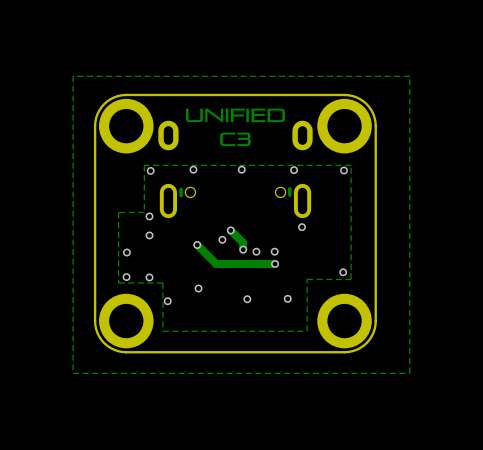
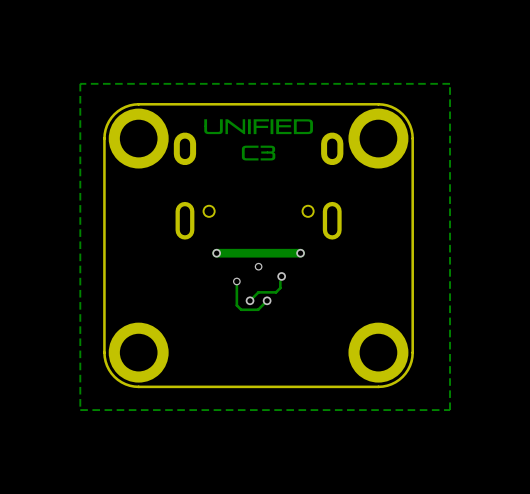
zone outline: (351, 165) (351, 279) (307, 279) (307, 331) (162, 331) (162, 282) (118, 282) (118, 212) (144, 212) (144, 165) (351, 165) -> none
via: (193, 169) -> none
via: (241, 169) -> none
via: (150, 170) -> none
via: (294, 170) -> none
via: (343, 170) -> none
track: (289, 188) (289, 195) -> none
track: (181, 189) (181, 195) -> none
via: (149, 216) -> none
via: (301, 227) -> none
via: none -> (216, 253)
track: (230, 230) (243, 242) (243, 249) -> none
via: (230, 230) -> none
track: none -> (300, 253) (216, 253)
via: none -> (300, 253)
via: (149, 235) -> none
via: (222, 239) -> none
via: none -> (258, 266)
track: (197, 244) (216, 263) (275, 263) -> none
via: (197, 244) -> none
via: (243, 249) -> none
via: (274, 251) -> none
via: (126, 252) -> none
track: none -> (236, 281) (236, 305) (241, 309) (258, 309) (267, 300)
via: none -> (236, 281)
track: none -> (280, 281) (280, 288) (276, 292) (258, 292) (250, 300)
via: (275, 263) -> none
via: (343, 272) -> none
via: none -> (250, 300)
via: none -> (267, 300)
via: (126, 277) -> none
via: (149, 277) -> none
via: (198, 288) -> none
via: (287, 298) -> none
via: (247, 299) -> none
via: (167, 301) -> none

